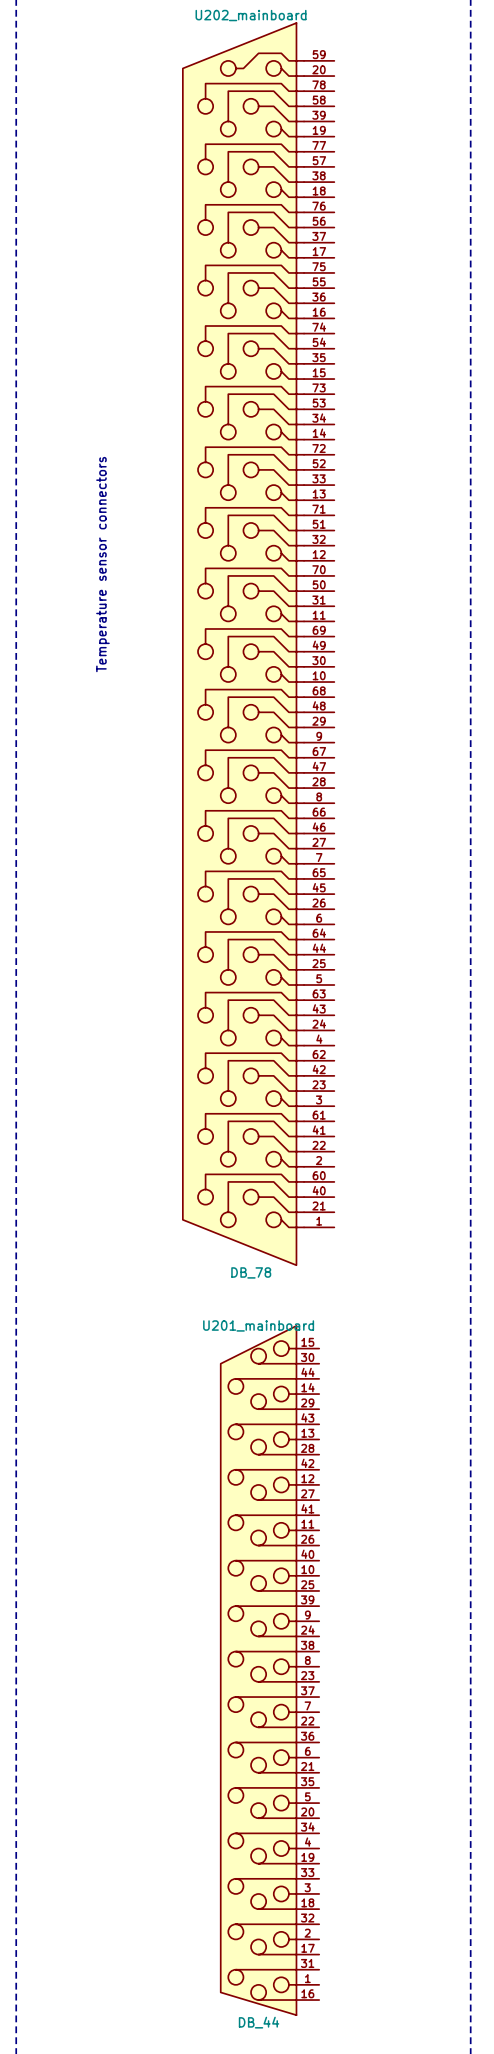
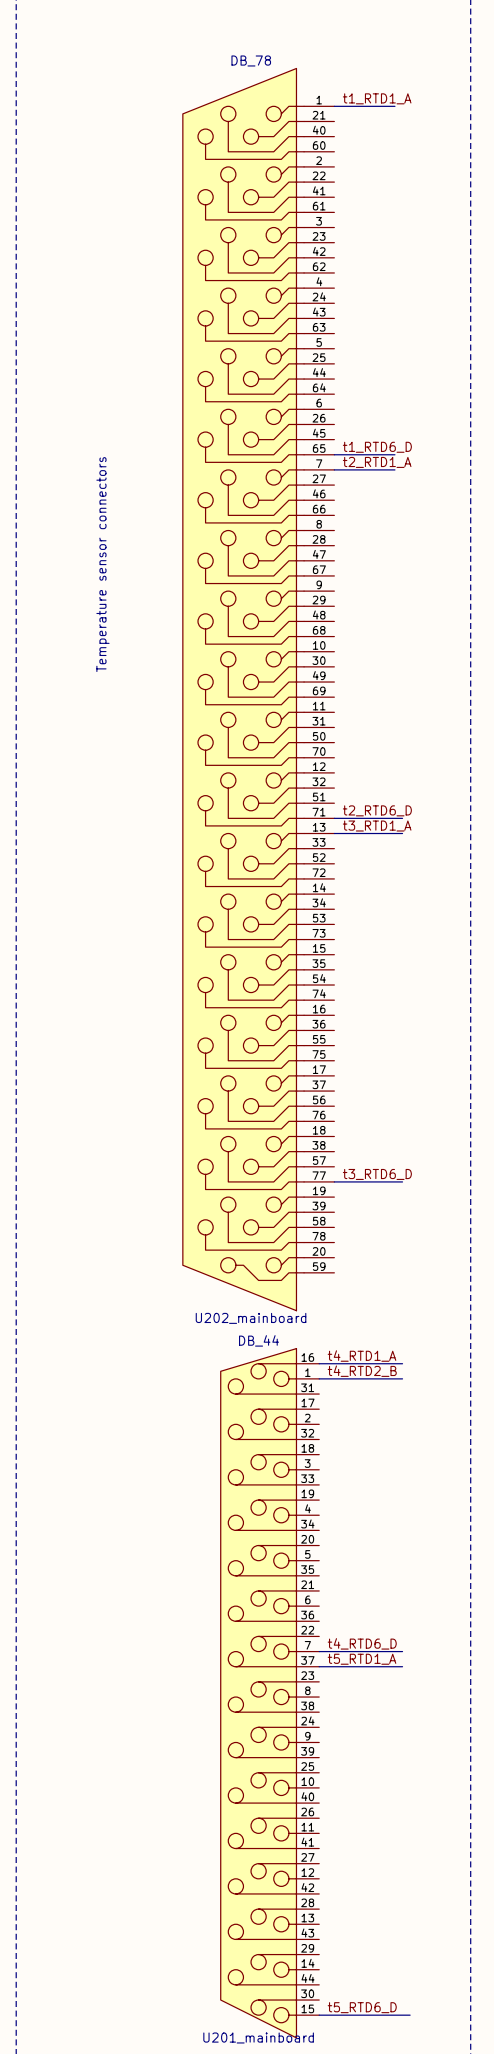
label: none -> t1_RTD1_A (377, 98)
wire: none -> (334, 106) (394, 106)
label: none -> t1_RTD6_D (377, 447)
wire: none -> (334, 454) (394, 454)
label: none -> t2_RTD1_A (377, 462)
wire: none -> (334, 469) (394, 469)
U202_mainboard flip: as is (243, 644) -> up-down (243, 689)
label: none -> t2_RTD6_D (377, 810)
wire: none -> (334, 818) (402, 818)
label: none -> t3_RTD1_A (377, 826)
wire: none -> (334, 833) (402, 833)
label: none -> t3_RTD6_D (377, 1174)
wire: none -> (334, 1181) (402, 1181)
label: none -> t4_RTD1_A (362, 1356)
wire: none -> (319, 1363) (402, 1363)
label: none -> t4_RTD2_B (362, 1371)
wire: none -> (319, 1378) (402, 1378)
label: none -> t4_RTD6_D (362, 1643)
wire: none -> (319, 1651) (402, 1651)
label: none -> t5_RTD1_A (362, 1659)
wire: none -> (319, 1666) (402, 1666)
U201_mainboard flip: as is (258, 1670) -> up-down (258, 1693)
label: none -> t5_RTD6_D (362, 2007)
wire: none -> (319, 2015) (410, 2015)

